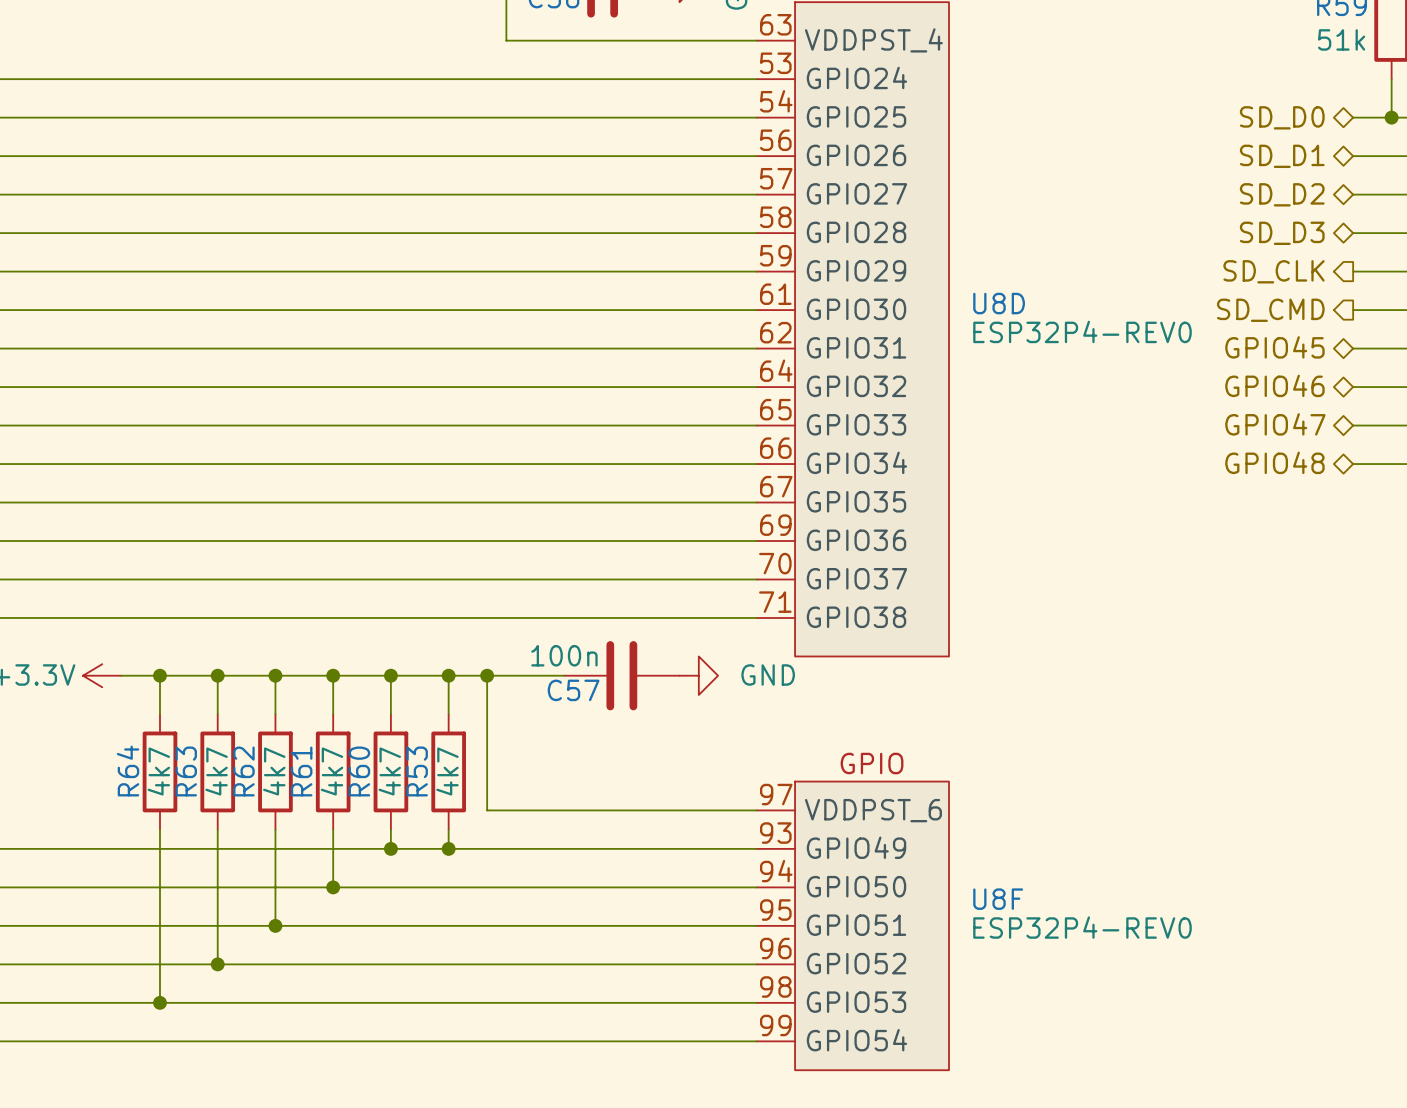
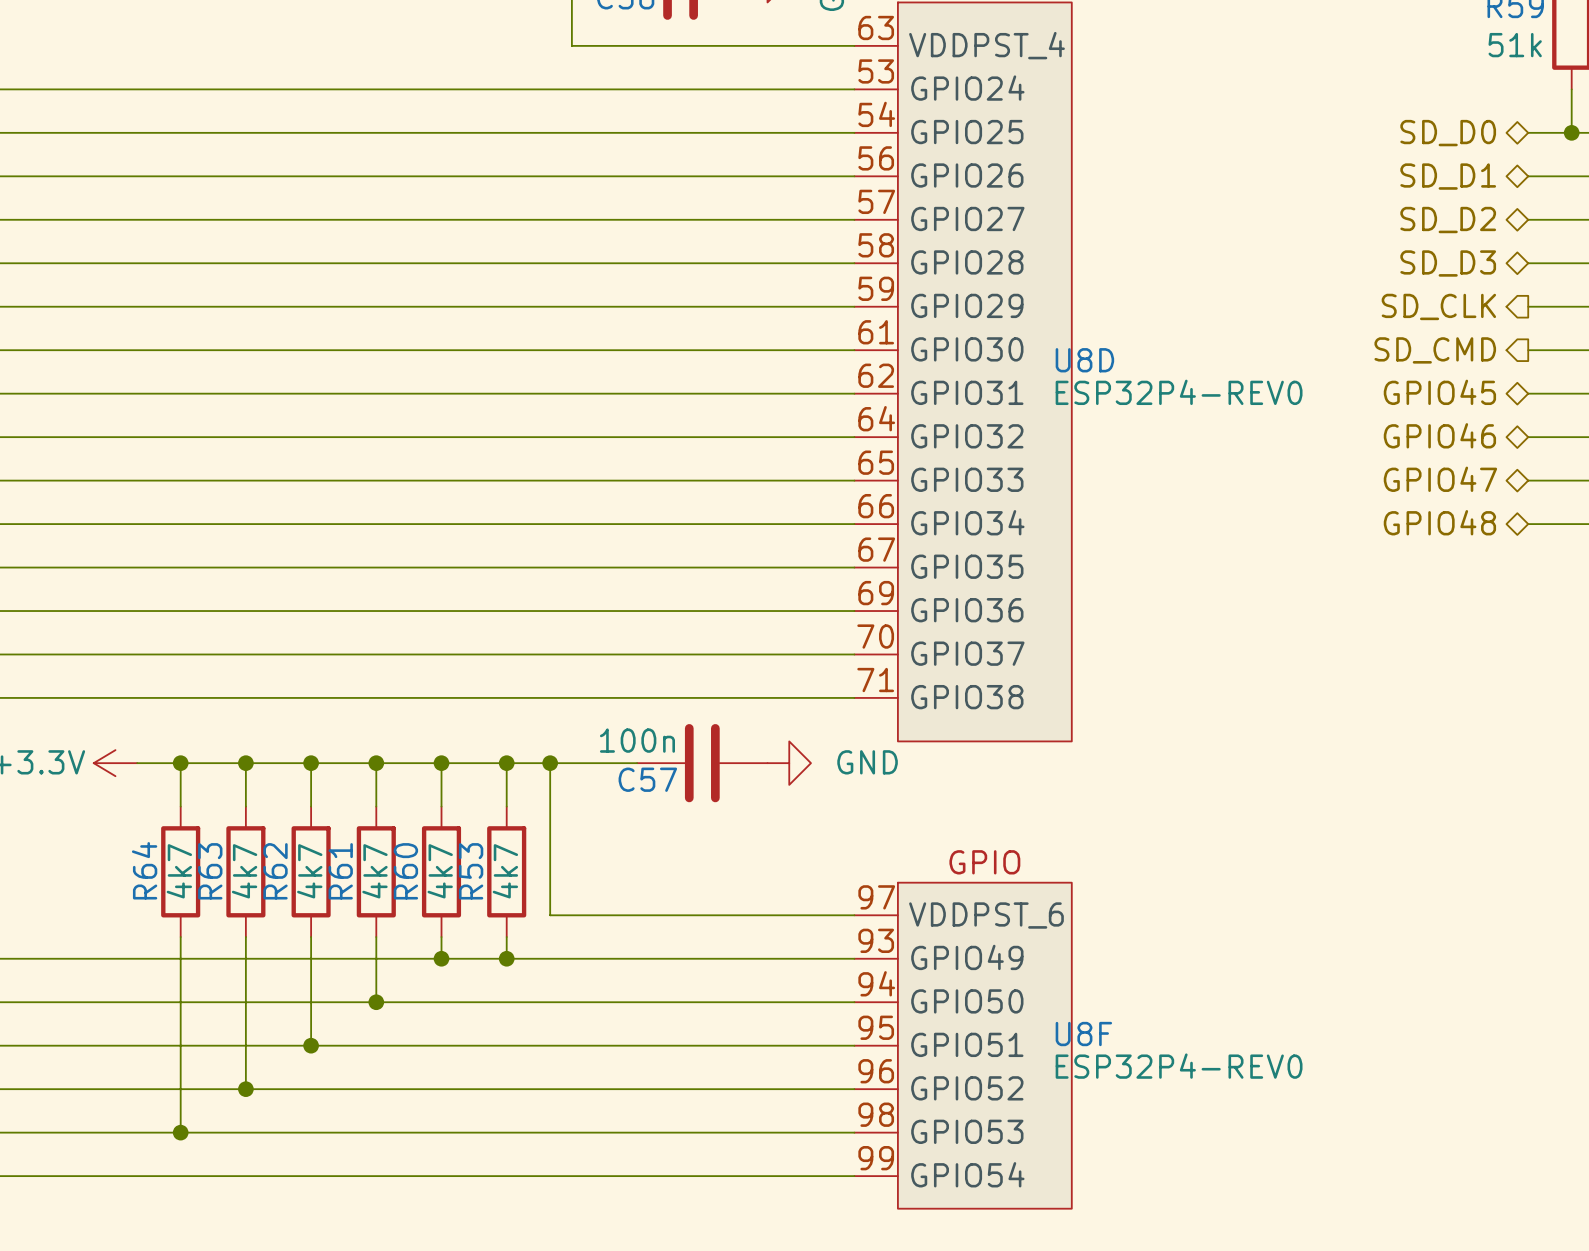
U8D name position: U8D (999, 303) -> U8D (1084, 360)
U8D value position: ESP32P4-REV0 (1082, 331) -> ESP32P4-REV0 (1179, 392)
U8F name position: U8F (998, 899) -> U8F (1083, 1034)
U8F value position: ESP32P4-REV0 (1082, 927) -> ESP32P4-REV0 (1179, 1066)

